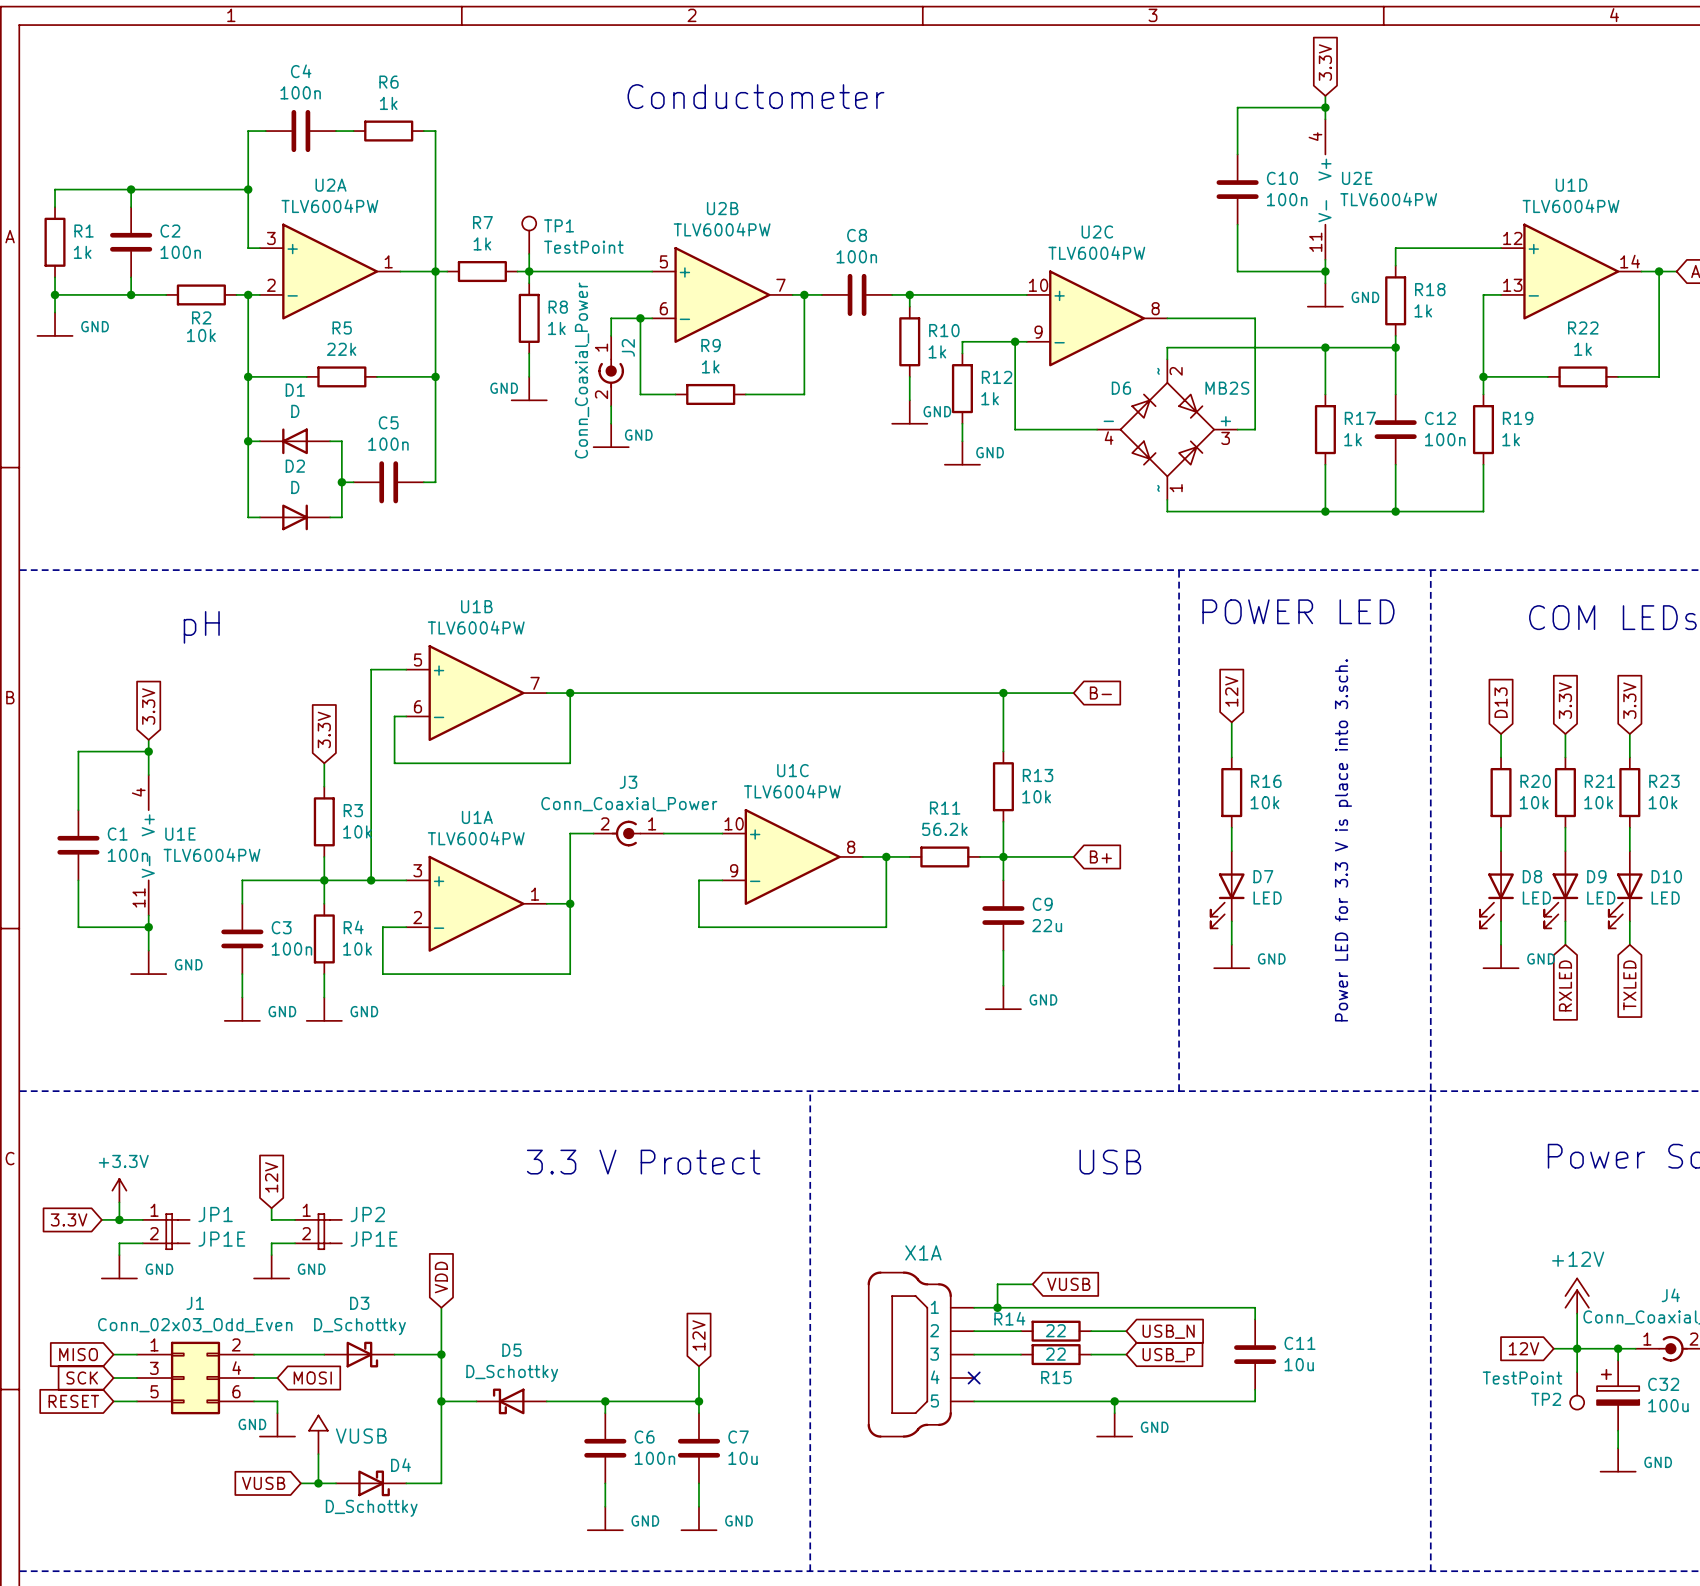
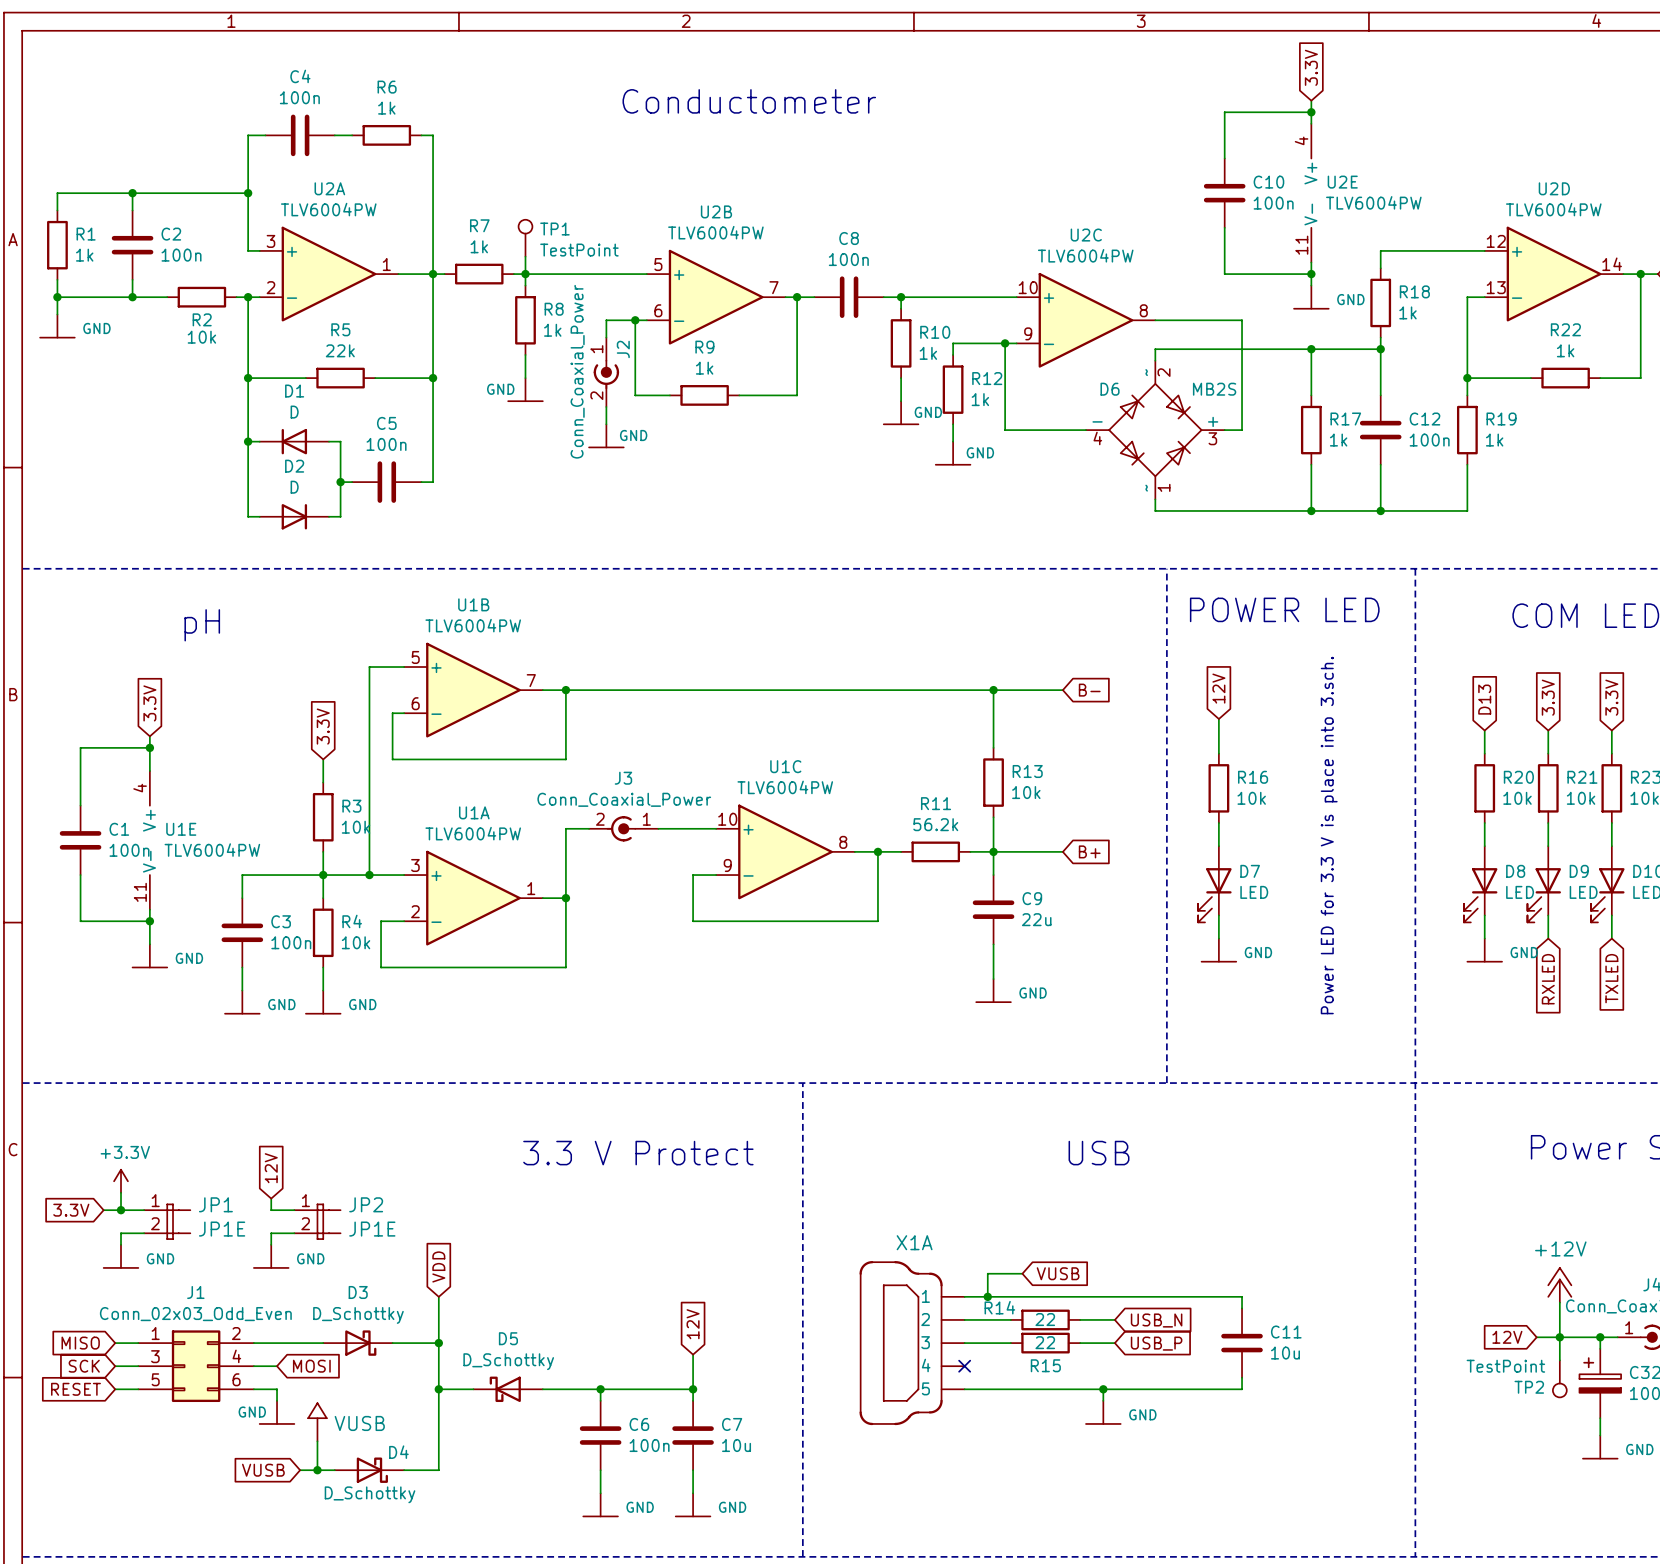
U1D name: U1D (1571, 185) -> U2D (1554, 188)

